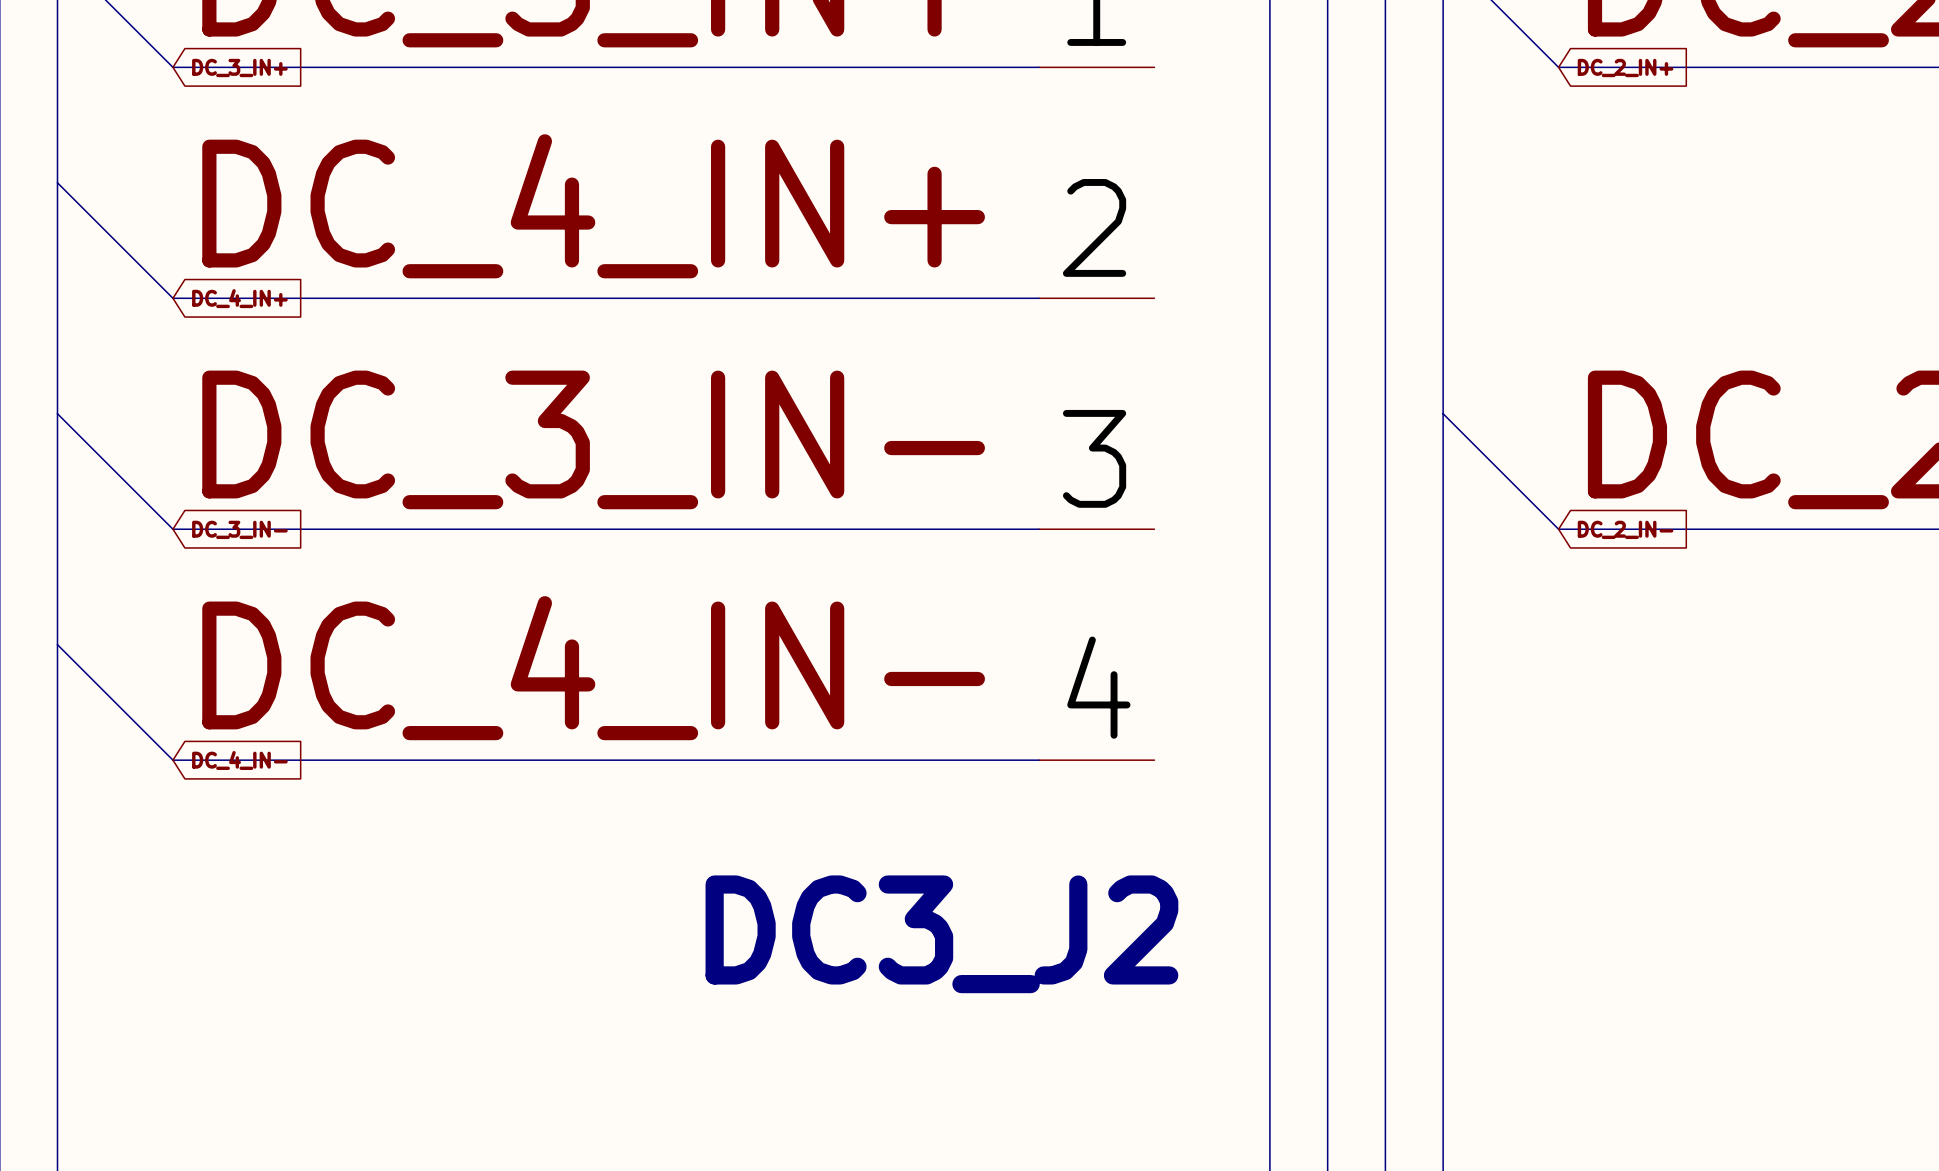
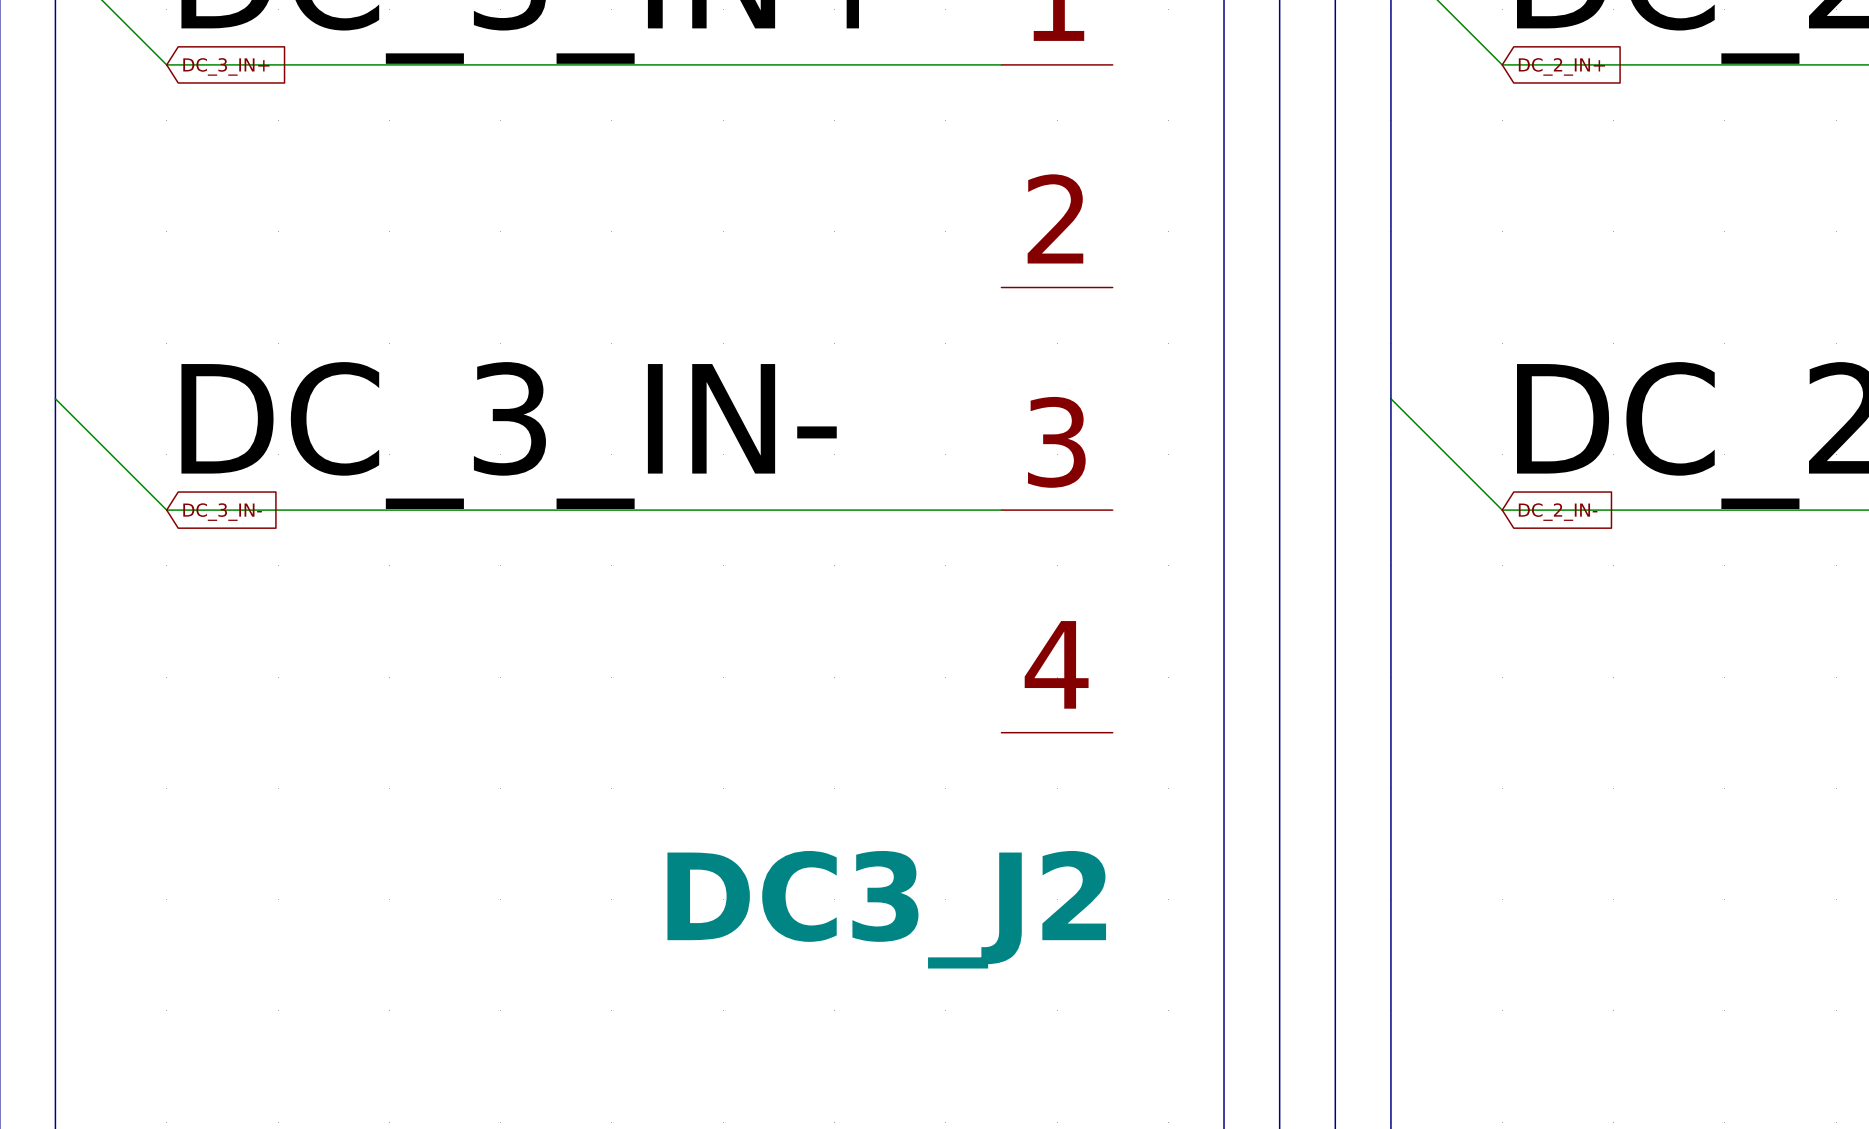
wire: (57, 182) (172, 298) (1038, 298) -> none
label: DC_4_IN+ (593, 206) -> none
global label: DC_4_IN+ (239, 298) -> none
wire: (57, 644) (172, 760) (1038, 760) -> none
label: DC_4_IN- (593, 668) -> none
global label: DC_4_IN- (239, 760) -> none

